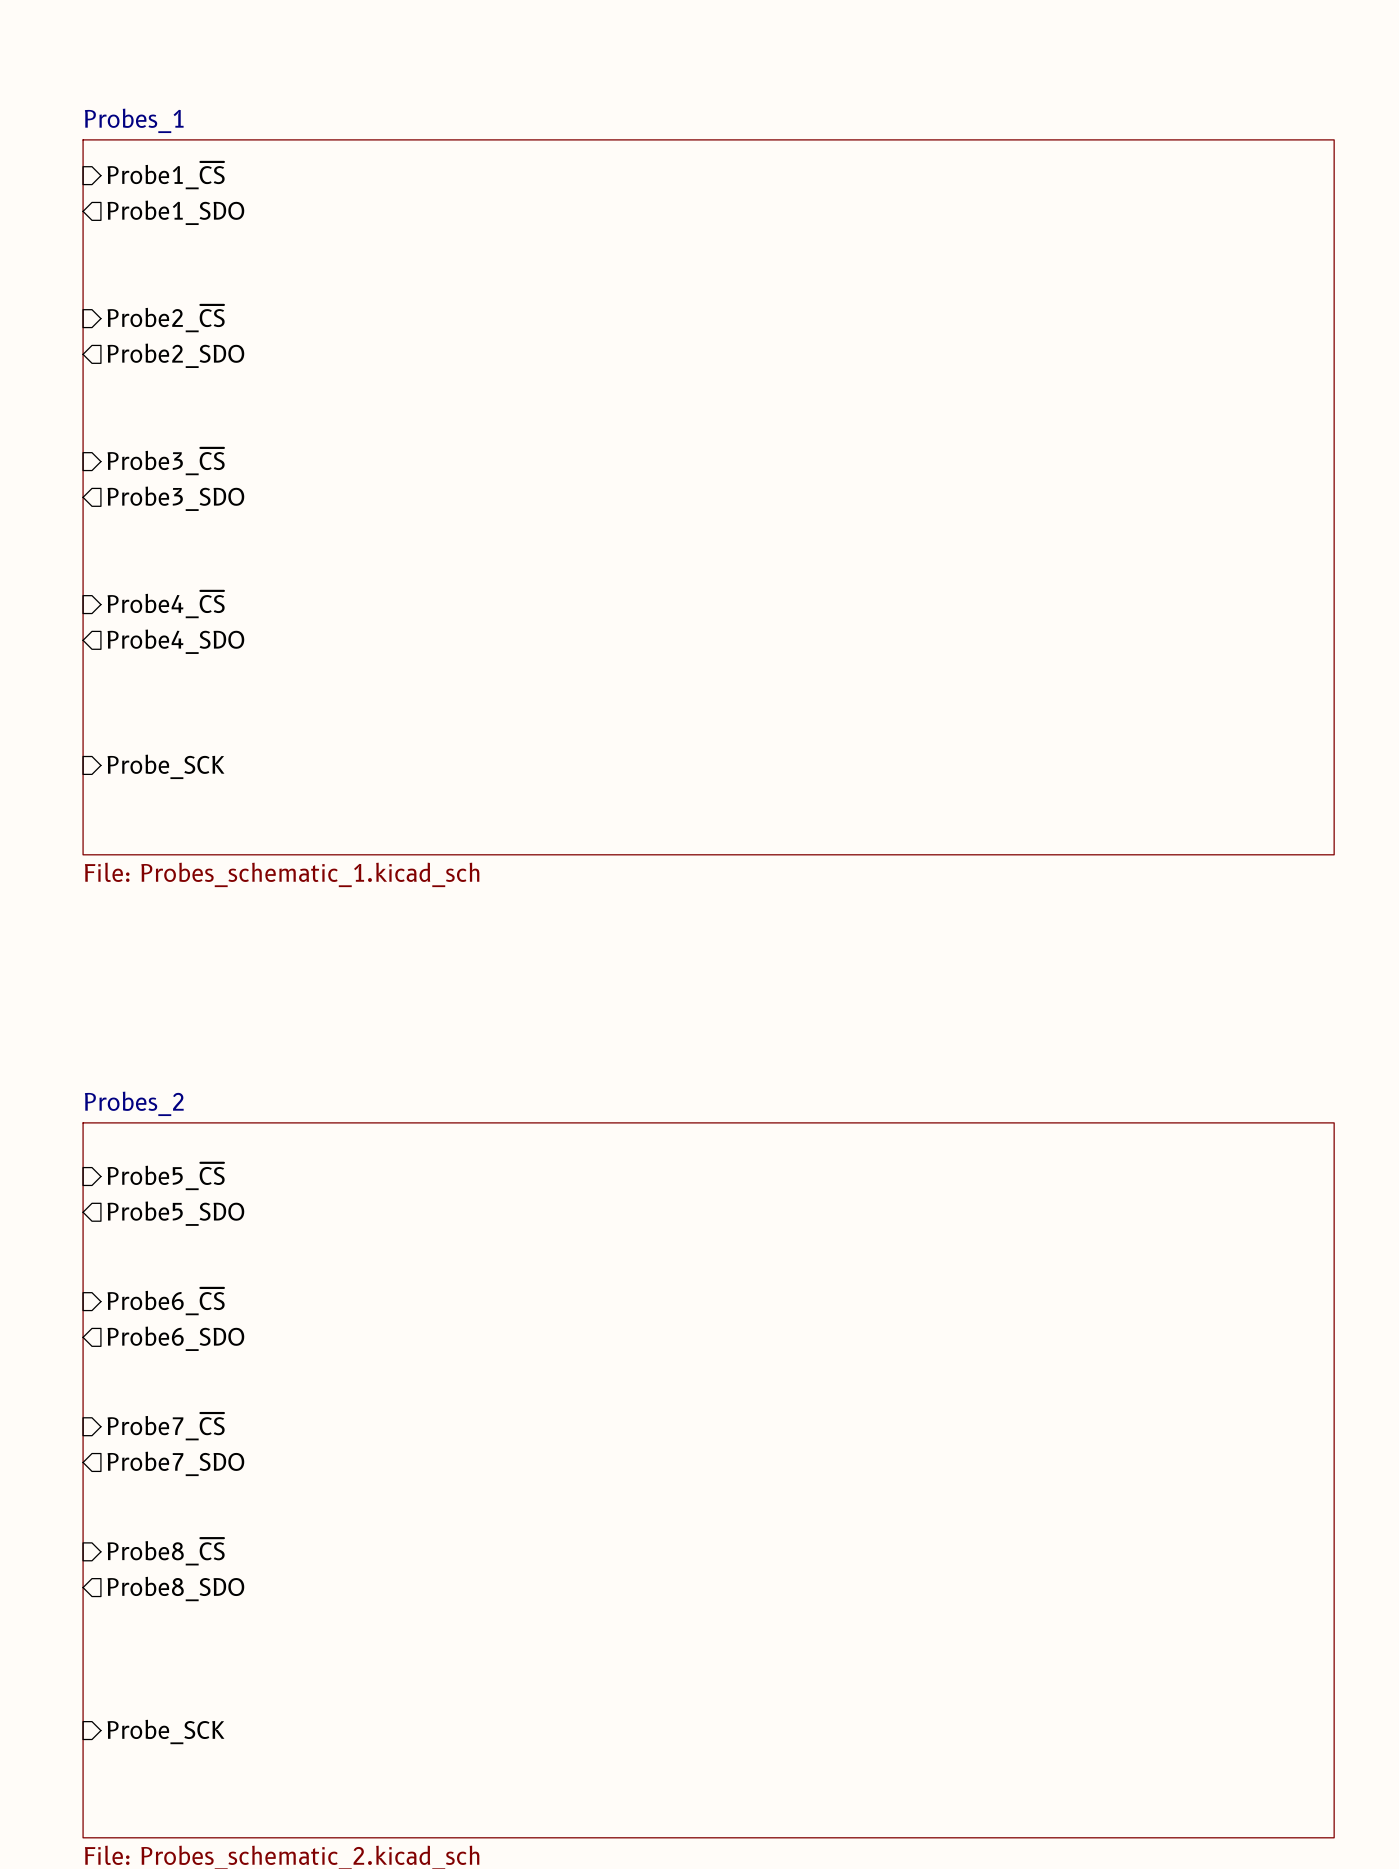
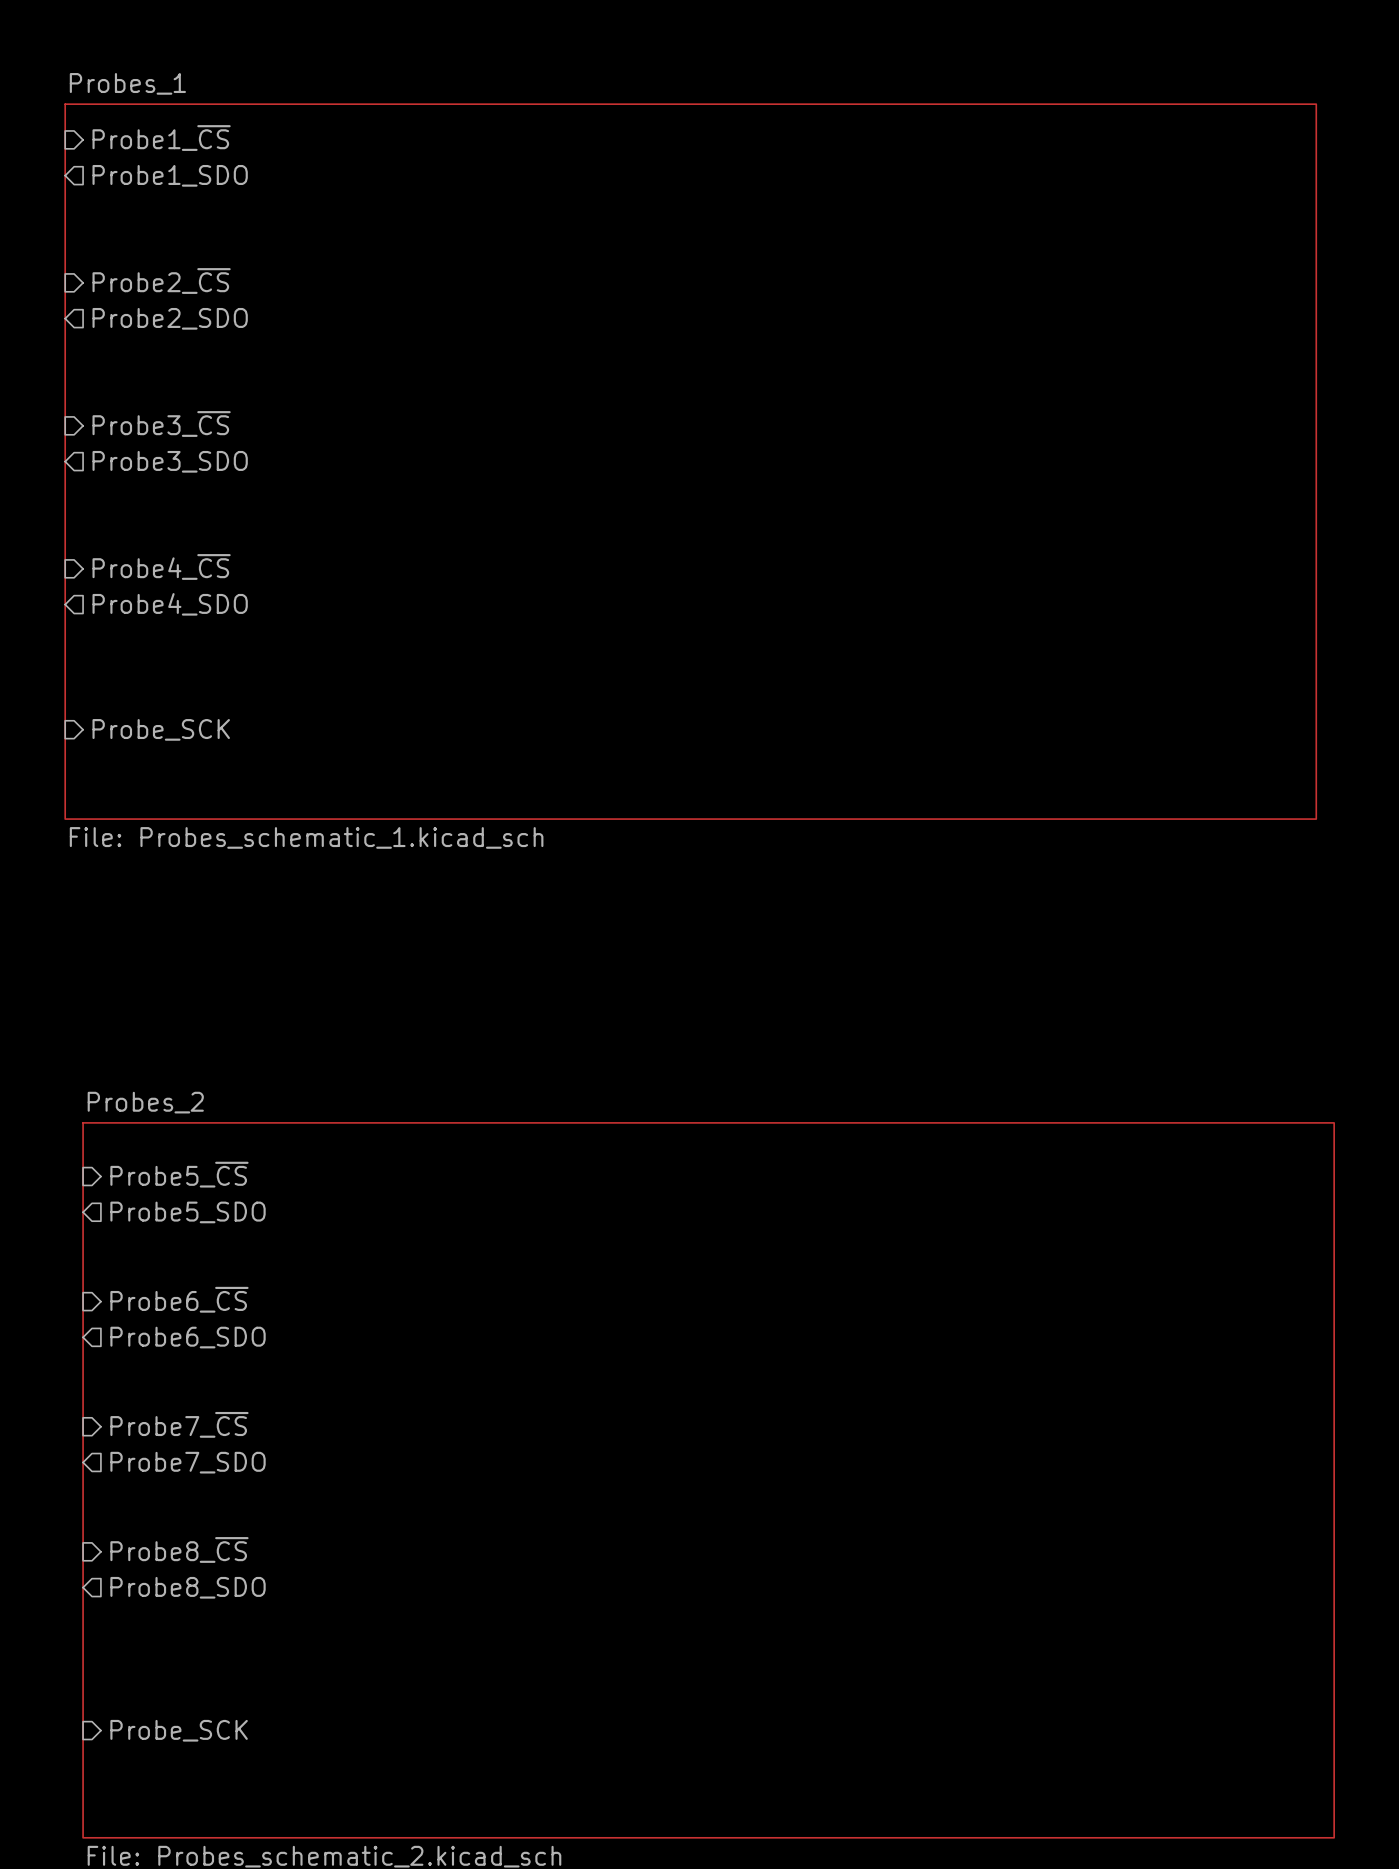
sheet pin position: Probe1_~{CS} (166, 175) -> Probe1_~{CS} (161, 138)
sheet pin position: Probe1_SDO (175, 212) -> Probe1_SDO (170, 175)
sheet pin position: Probe2_~{CS} (166, 318) -> Probe2_~{CS} (161, 281)
sheet pin position: Probe2_SDO (175, 355) -> Probe2_SDO (170, 318)
sheet pin position: Probe3_~{CS} (166, 461) -> Probe3_~{CS} (161, 423)
sheet Probes_1 position: (708, 497) -> (690, 461)
sheet pin position: Probe3_SDO (175, 498) -> Probe3_SDO (170, 461)
sheet pin position: Probe4_~{CS} (166, 604) -> Probe4_~{CS} (161, 566)
sheet pin position: Probe4_SDO (175, 641) -> Probe4_SDO (170, 604)
sheet pin position: Probe_SCK (165, 766) -> Probe_SCK (161, 729)

